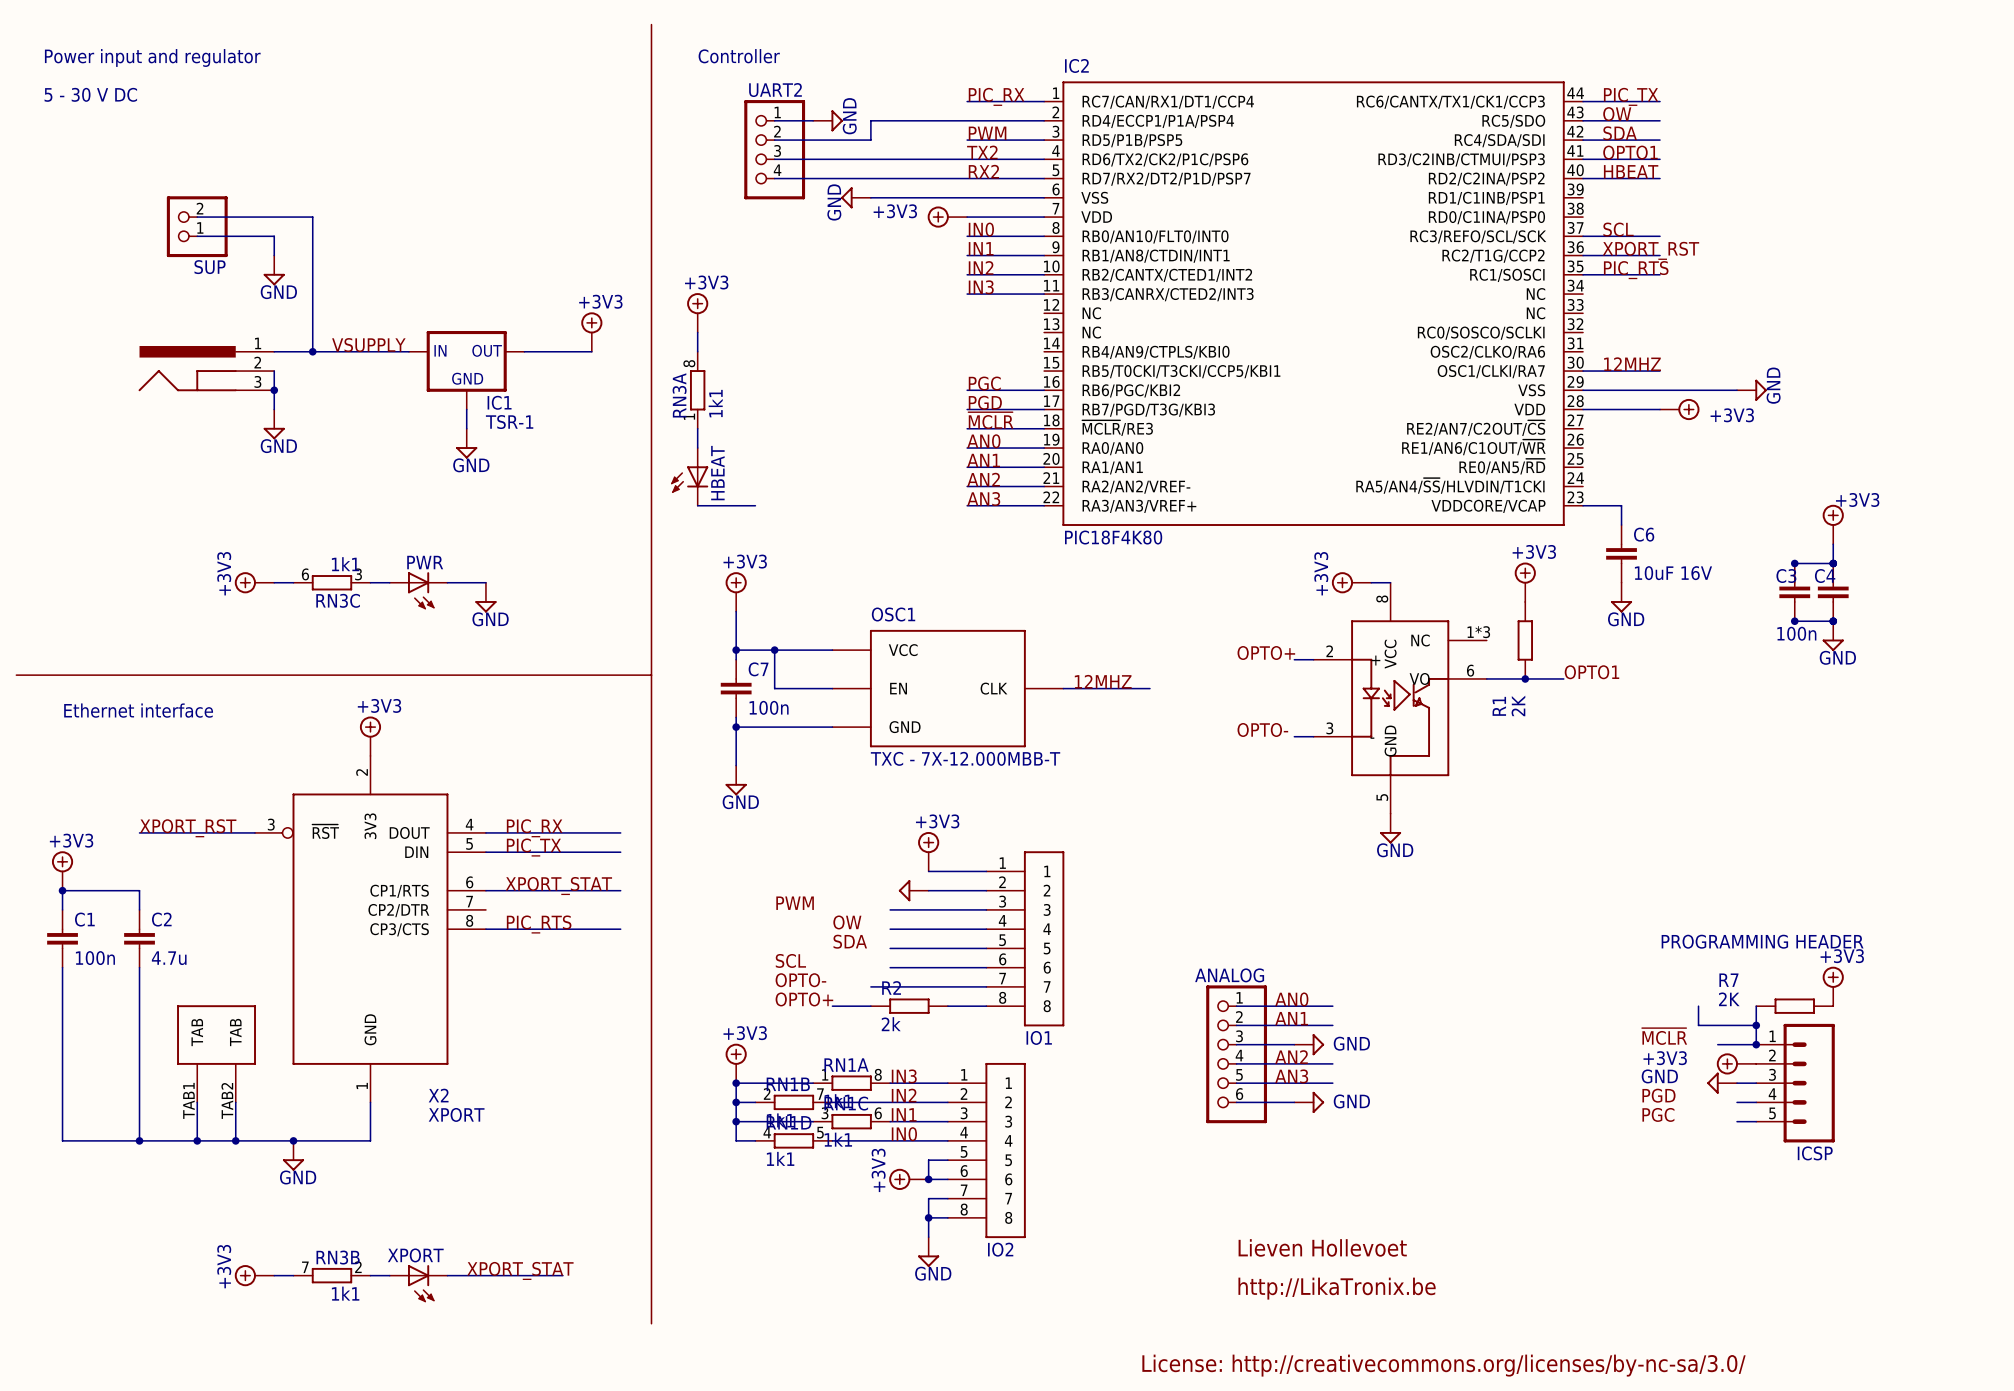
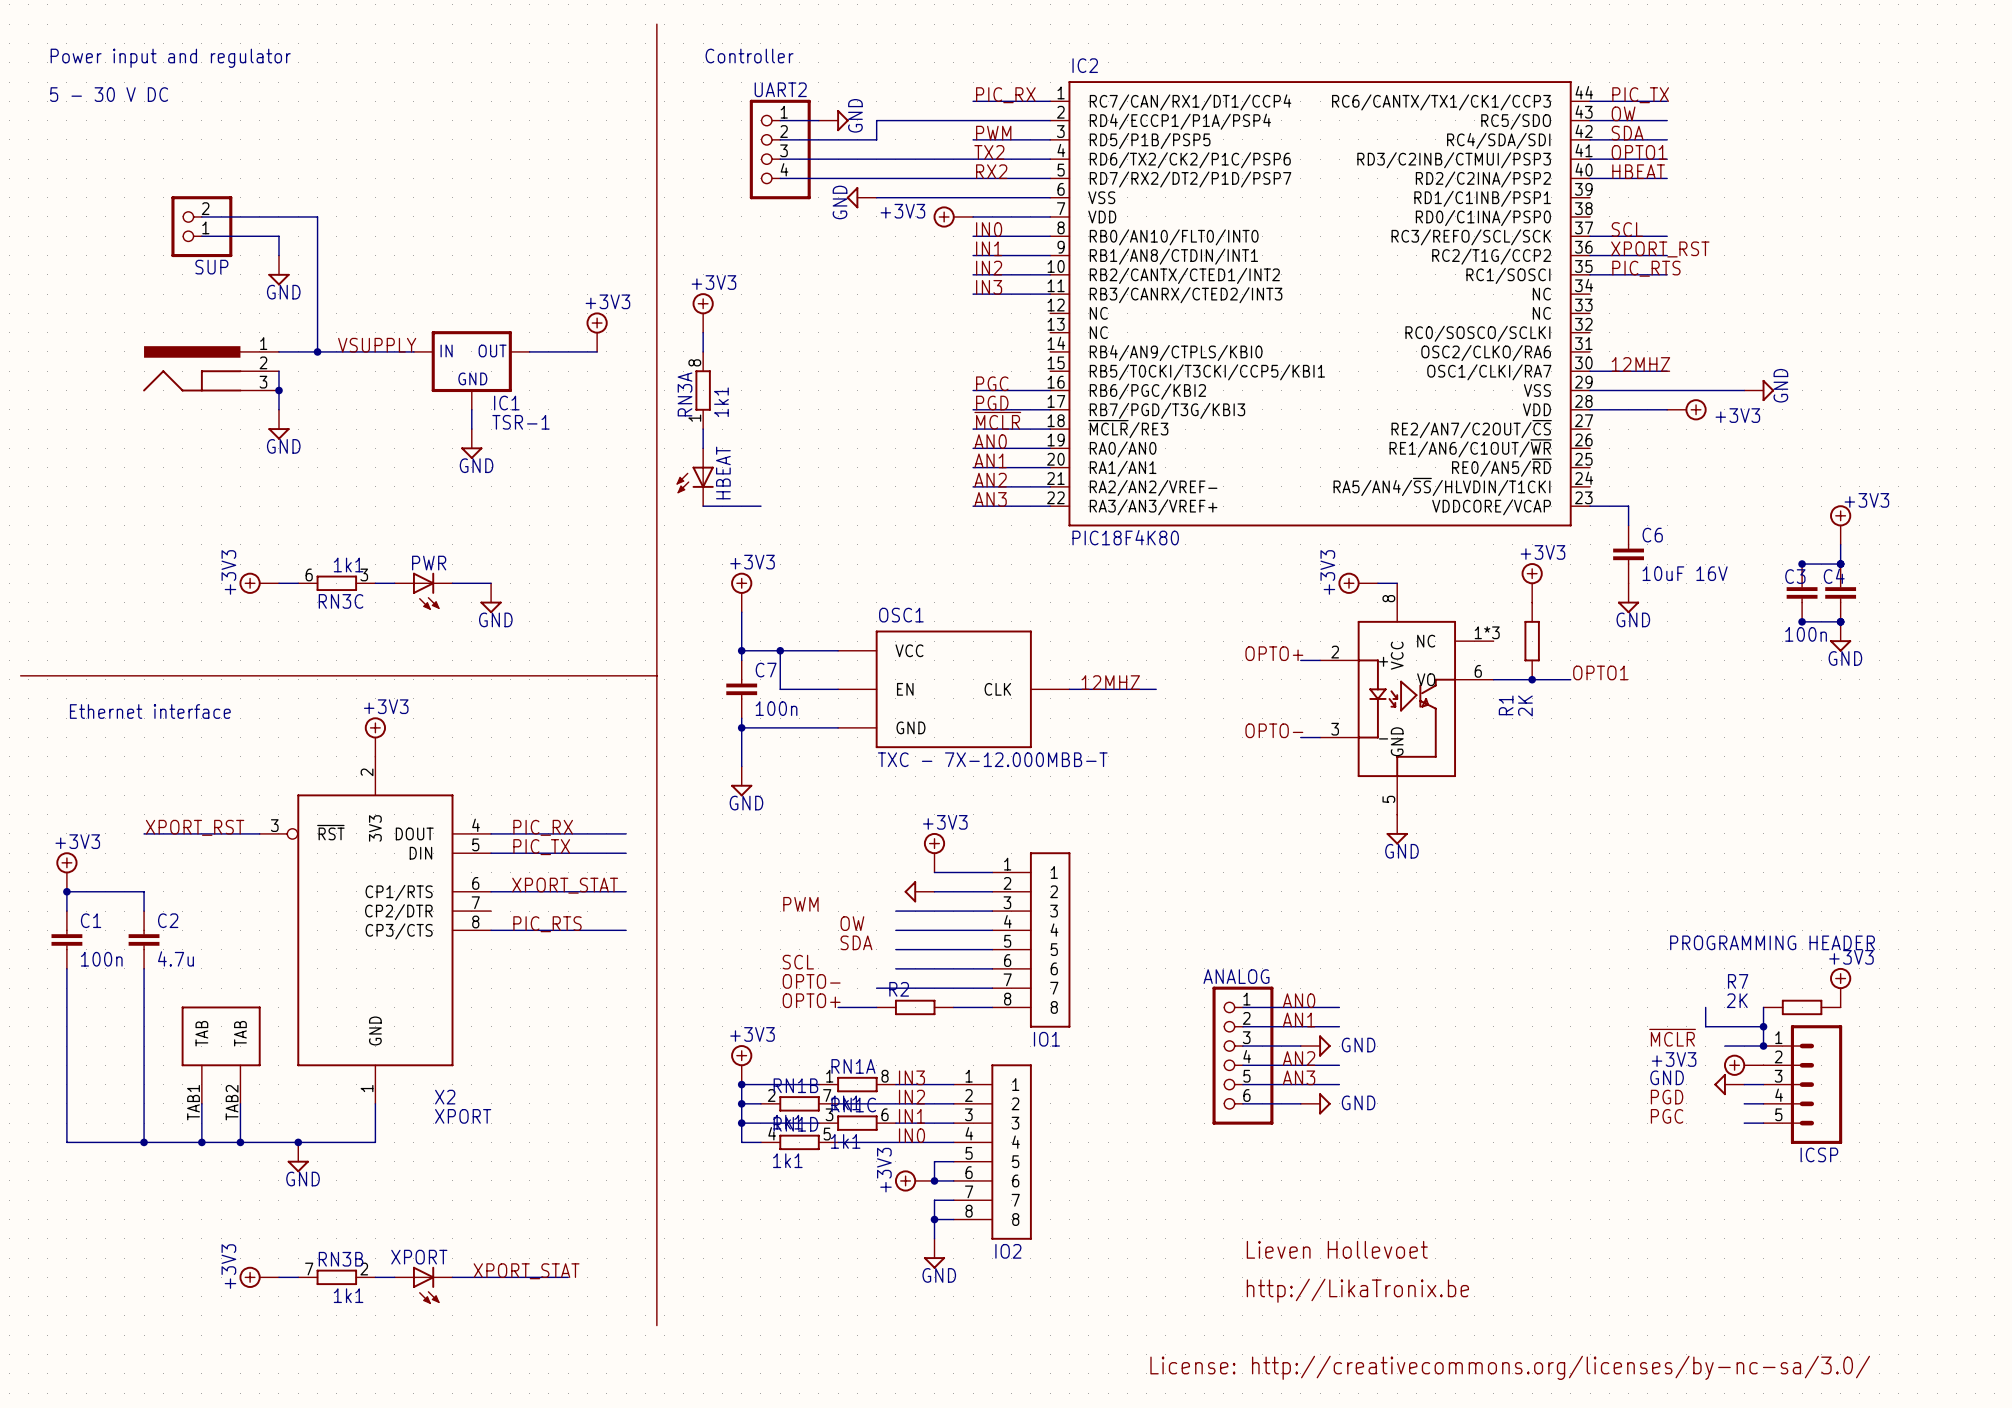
R2 value: 2k (891, 1024) -> none

